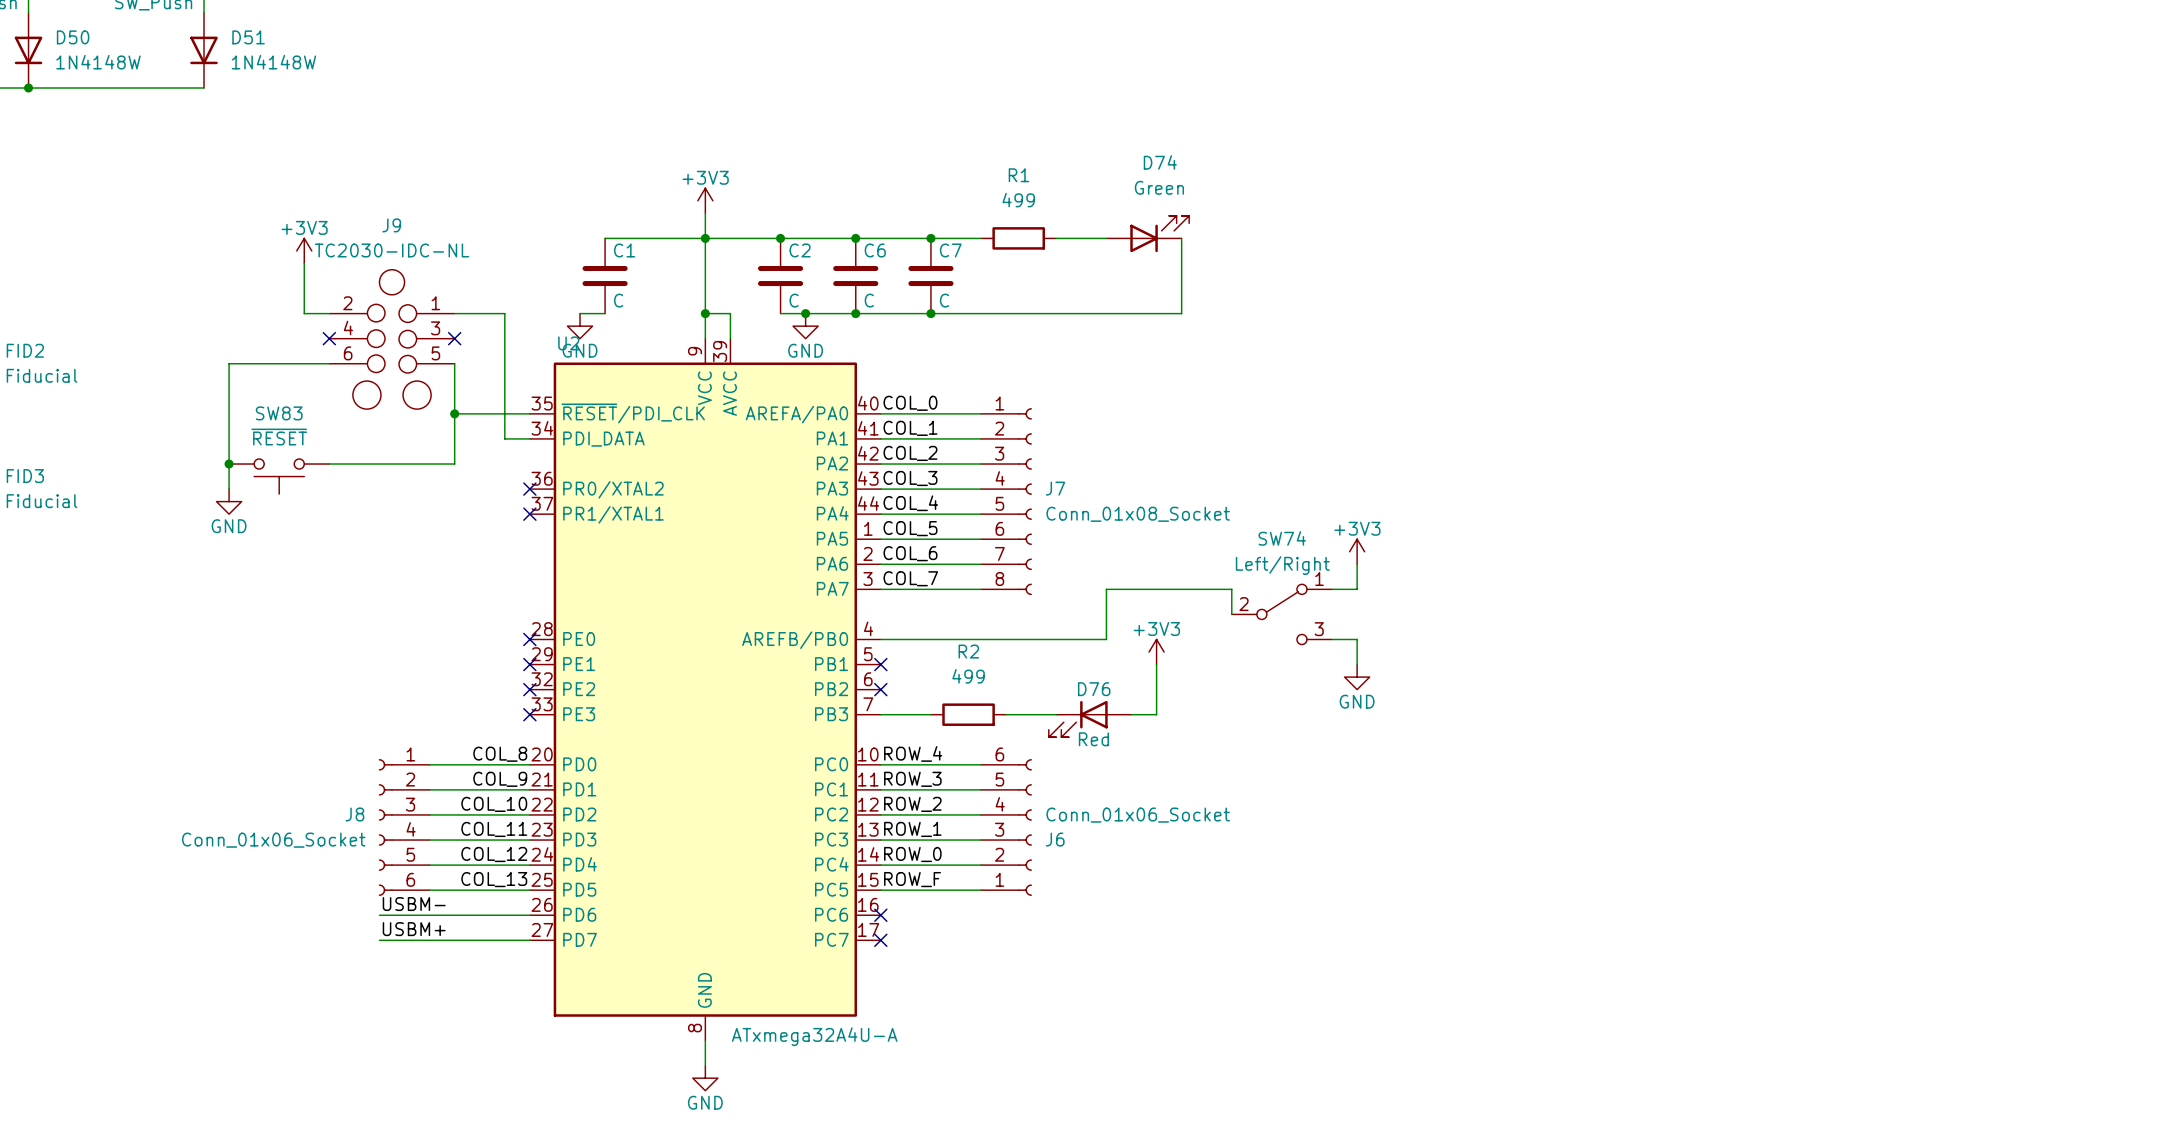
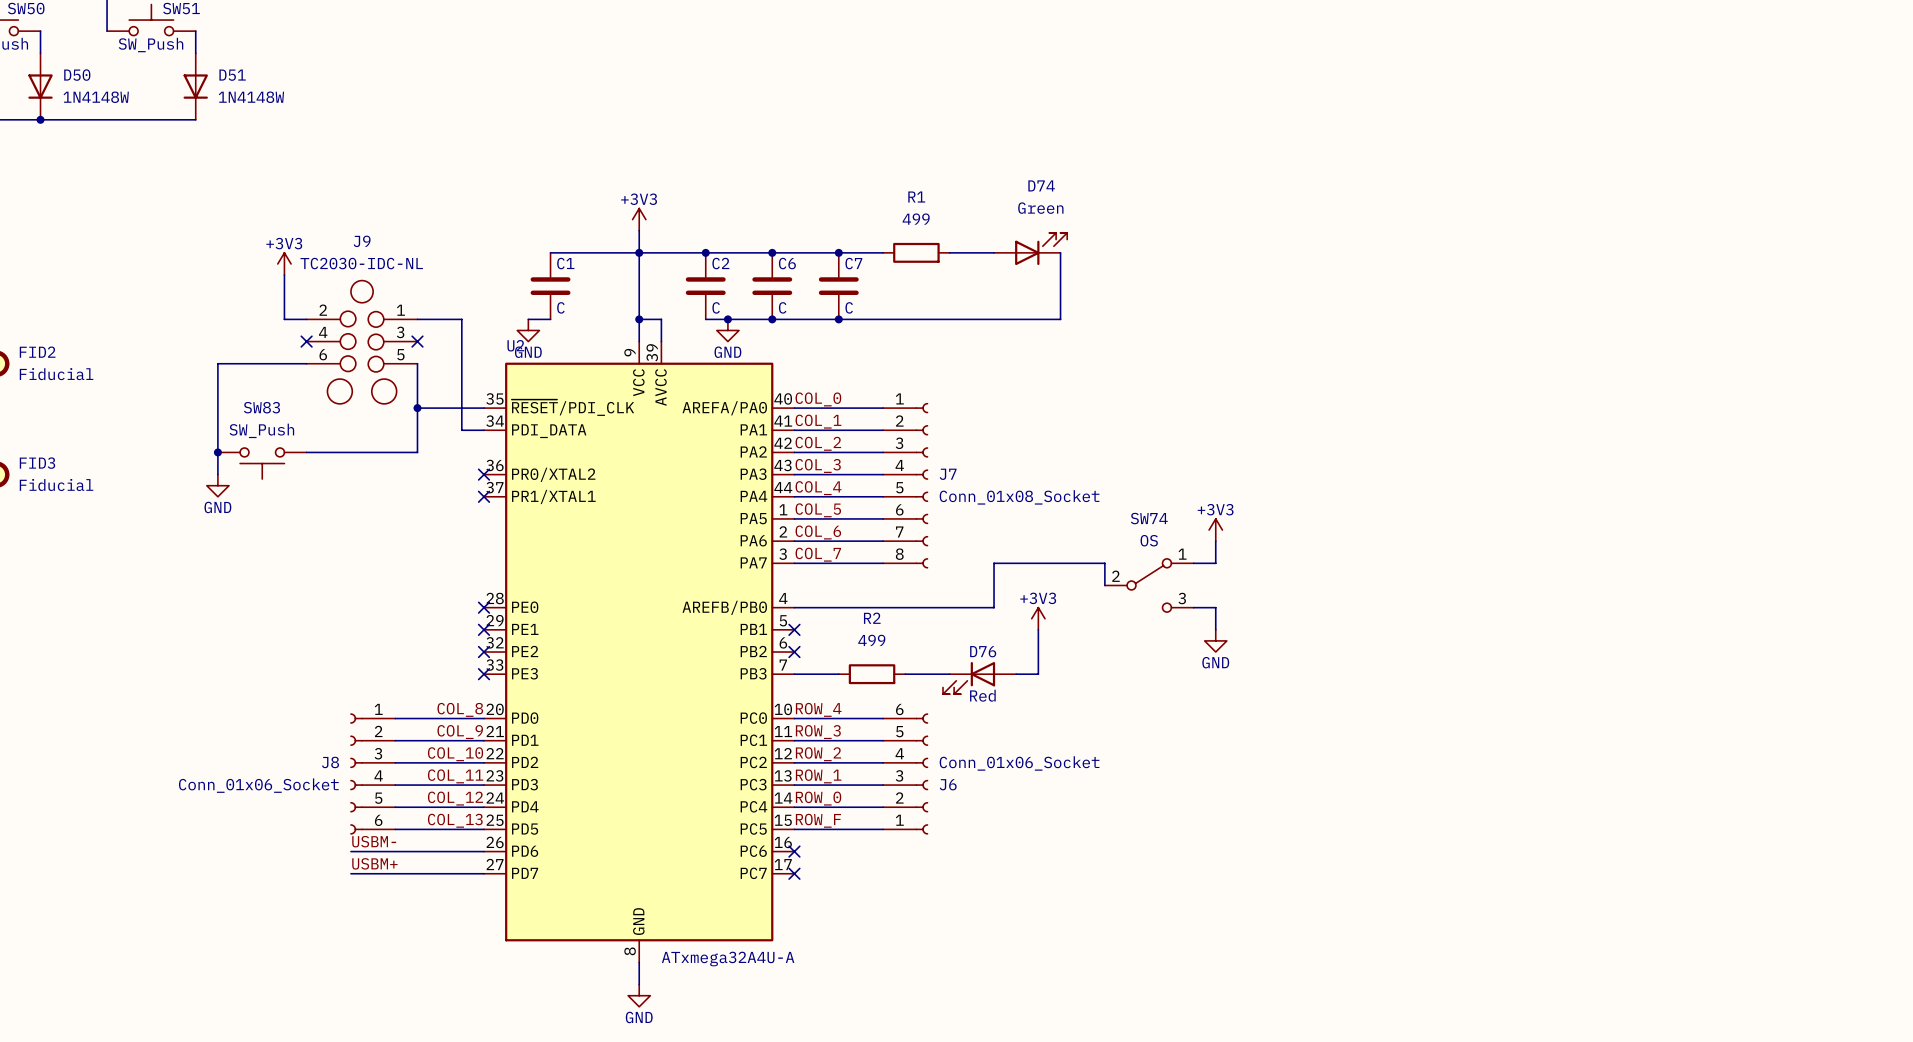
SW83 value: ~{RESET} (279, 437) -> SW_Push (261, 430)
SW74 value: Left/Right (1282, 565) -> OS (1149, 540)

